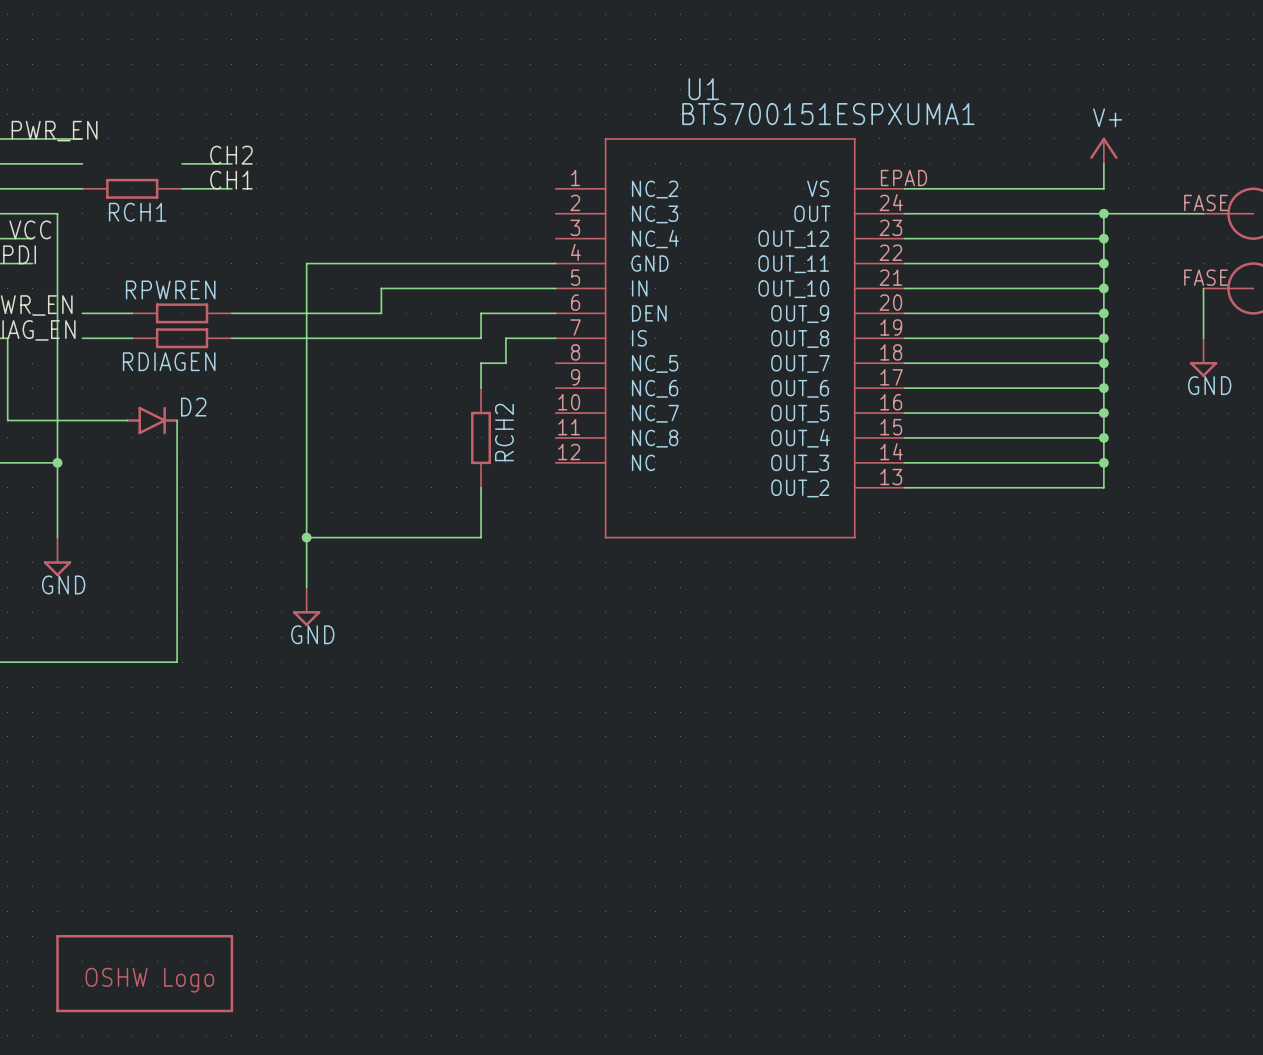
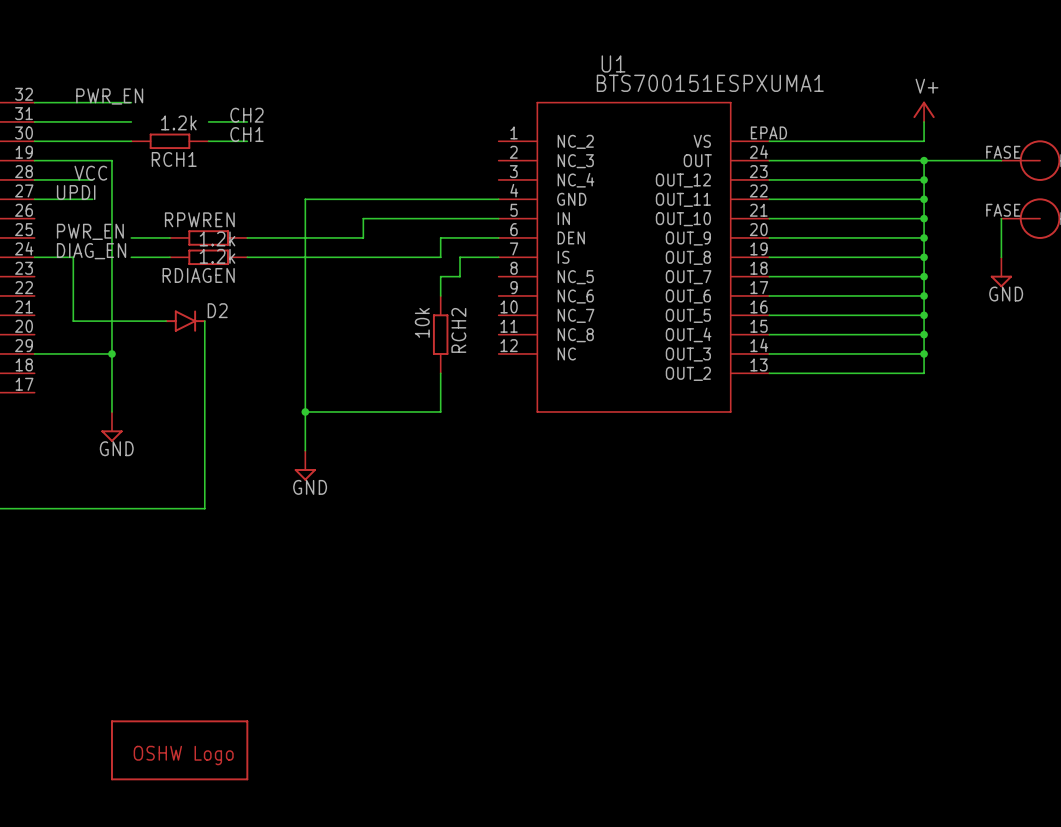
RCH1 value: none -> 1.2k (178, 122)
RDIAGEN value: none -> 1.2k (217, 238)
RPWREN value: none -> 1.2k (217, 256)
RCH2 value: none -> 10k (422, 322)

